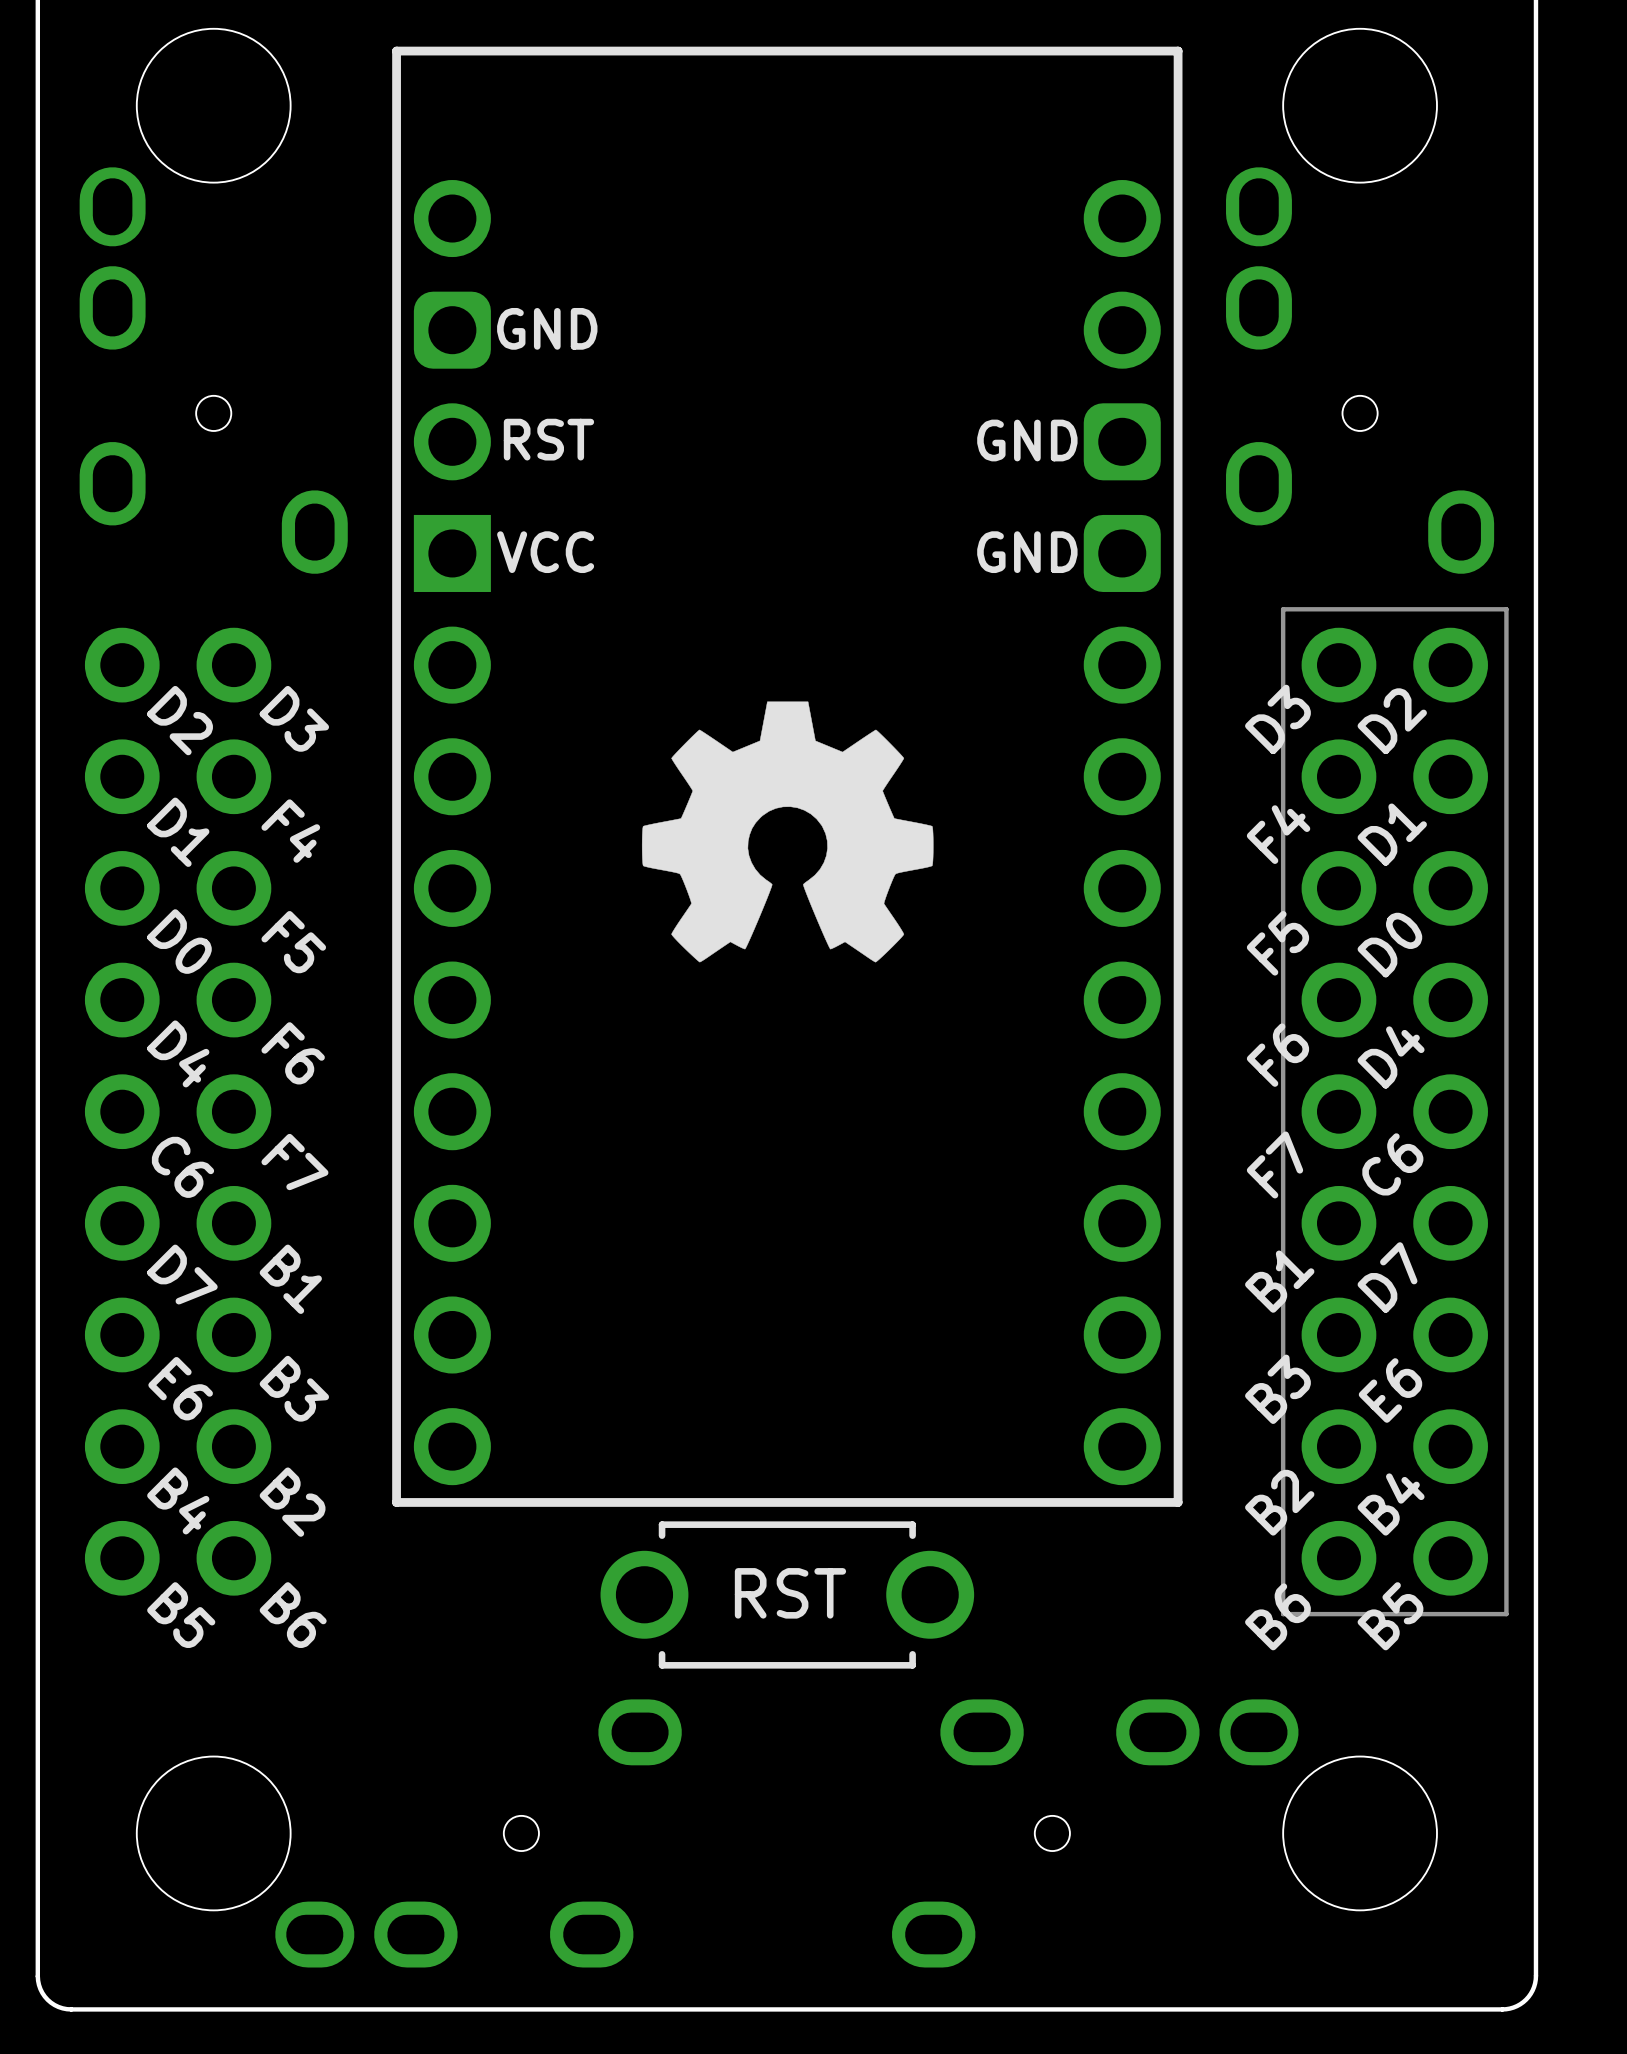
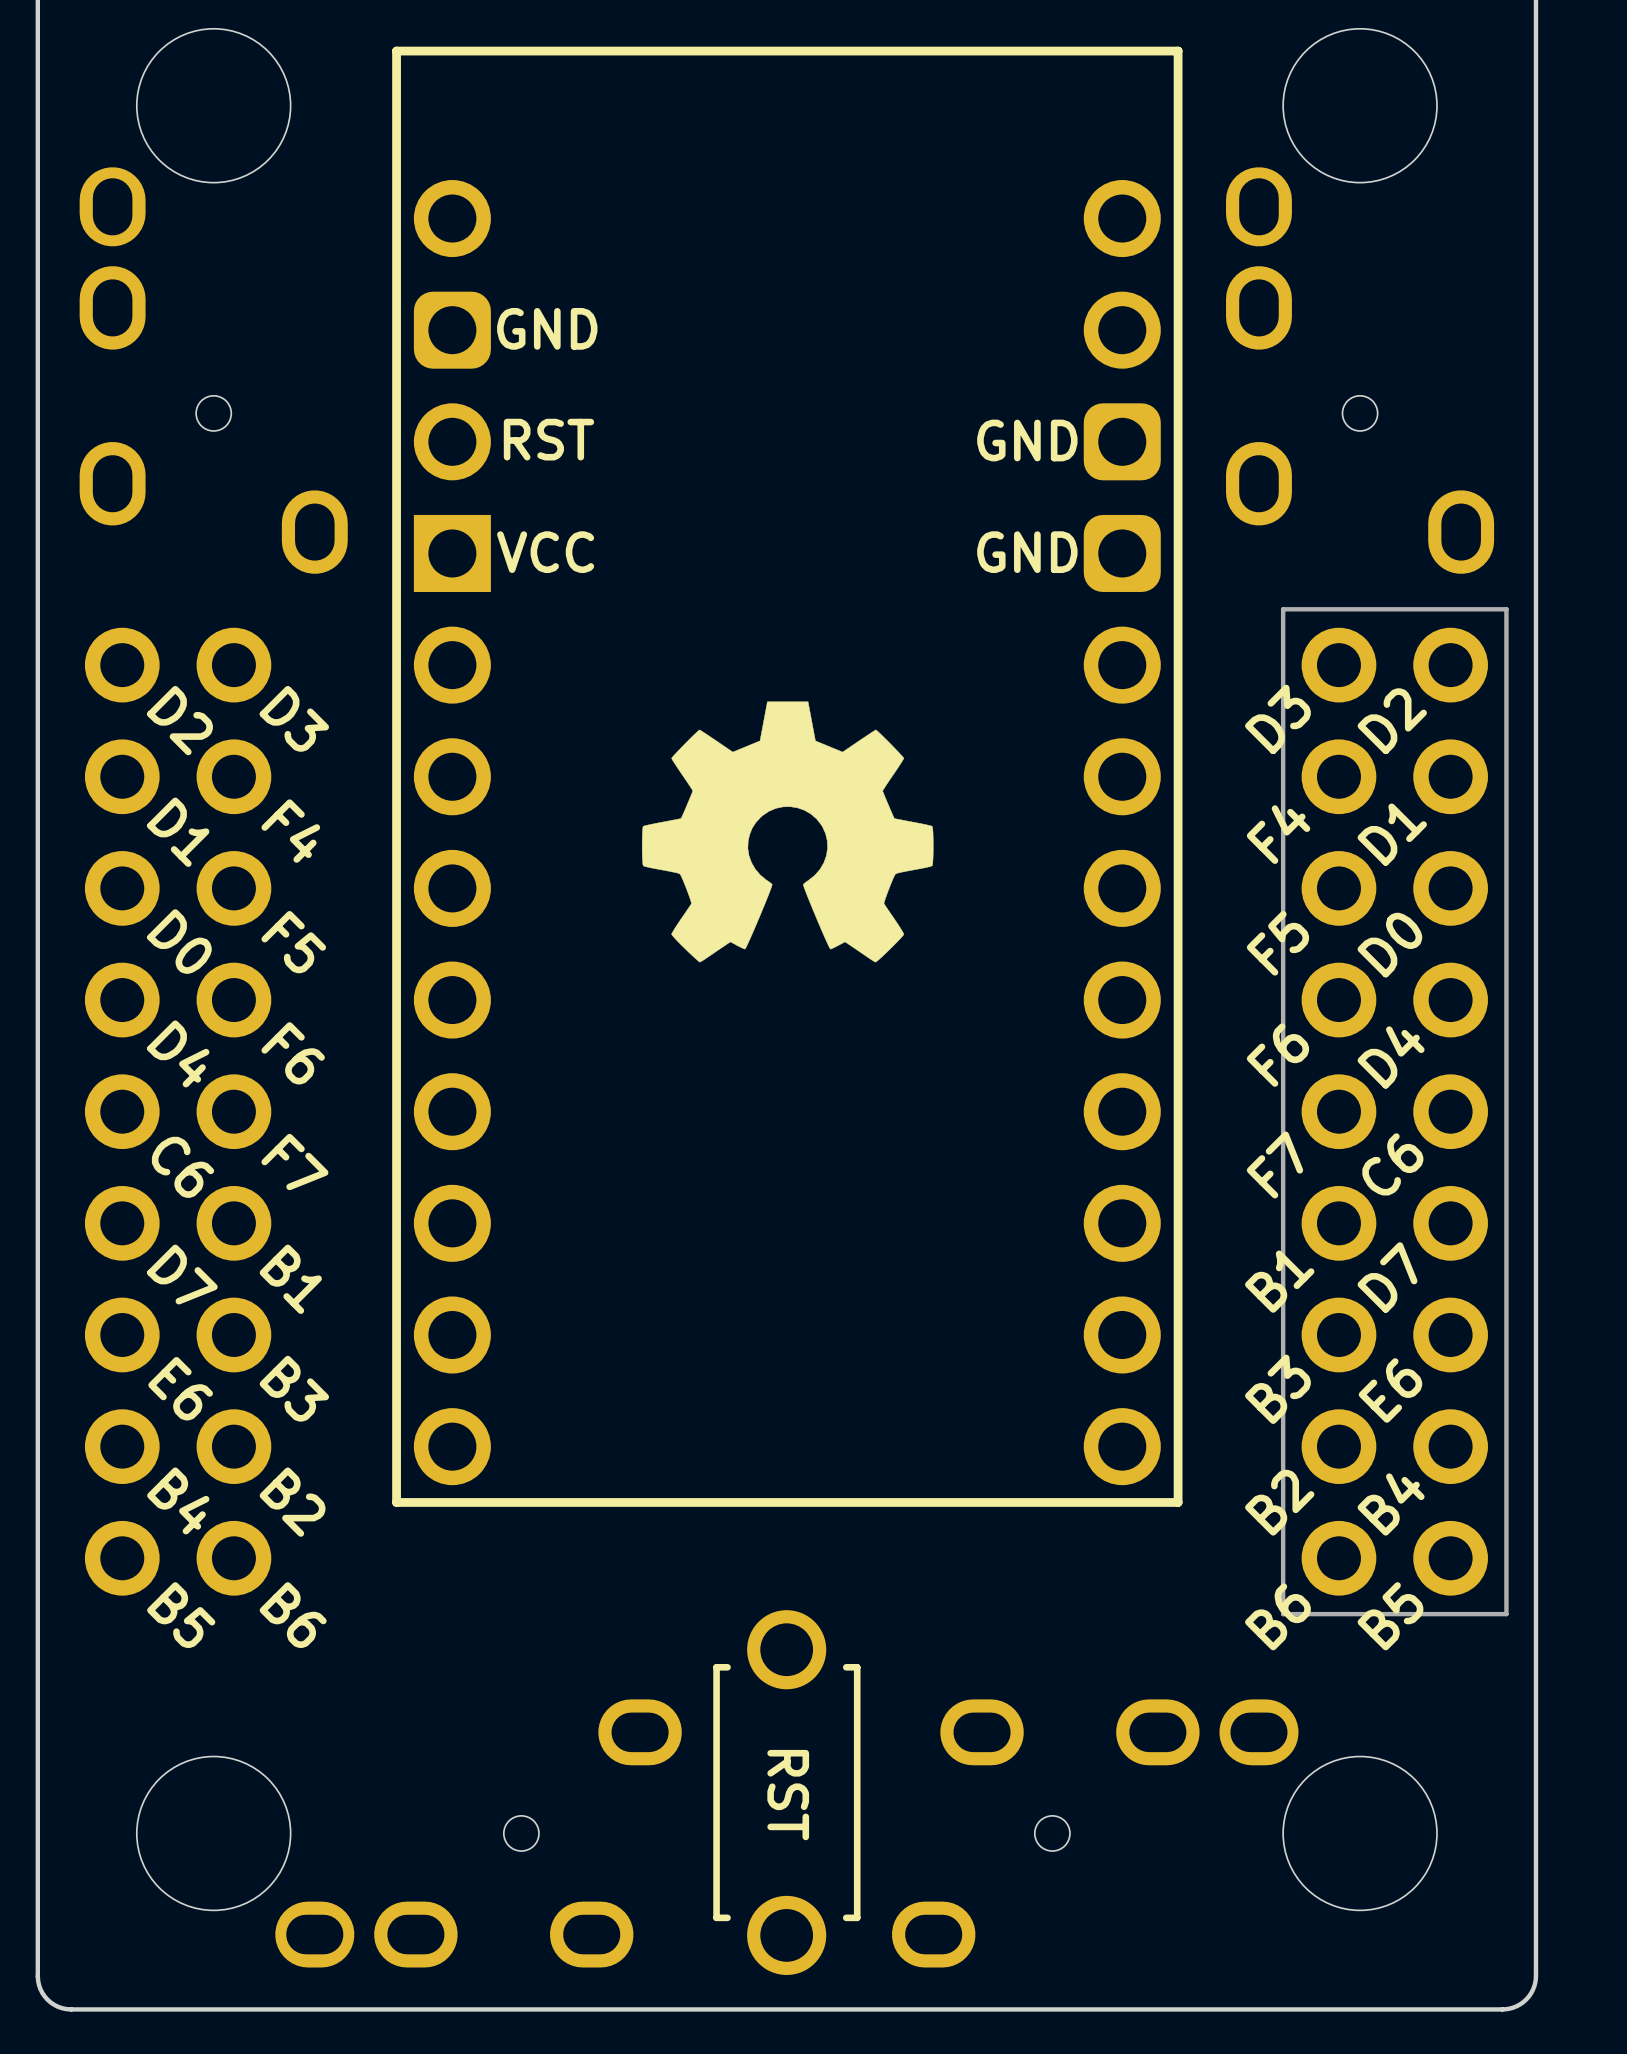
part: (787, 1594) -> none
part: none -> (786, 1792)

